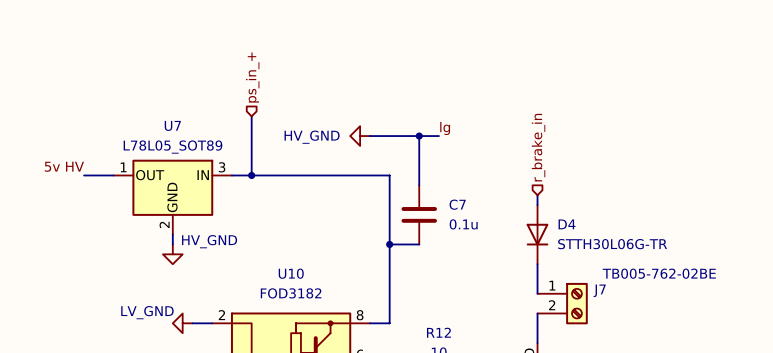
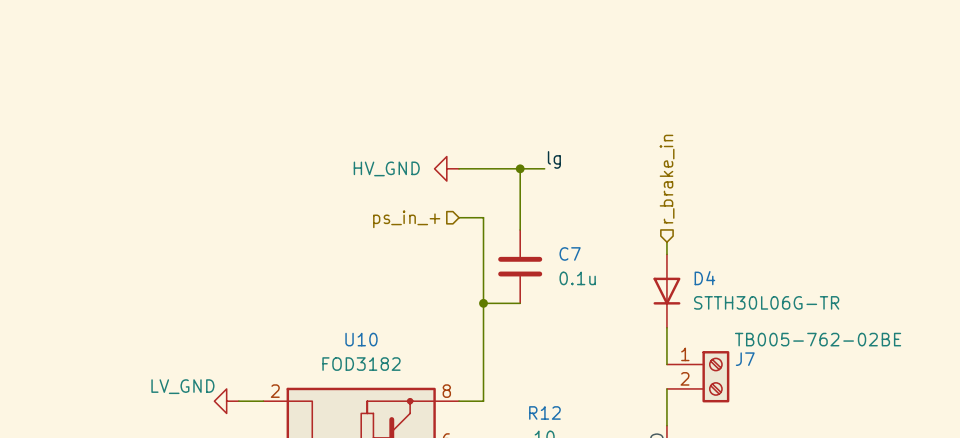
hierarchical label rotation: 0° (252, 77) -> 90° counterclockwise (406, 219)
hierarchical label position: ps_in_+ (252, 77) -> ps_in_+ (406, 219)
wire: (251, 116) (251, 175) -> none
label: 5v HV (64, 166) -> none
wire: (84, 175) (113, 175) -> none
wire: (231, 175) (369, 175) -> none
junction: (251, 175) -> none
U7: L78L05_SOT89 (172, 197) -> none
wire: (172, 234) (172, 244) -> none
power symbol: HV_GND (172, 254) -> none

